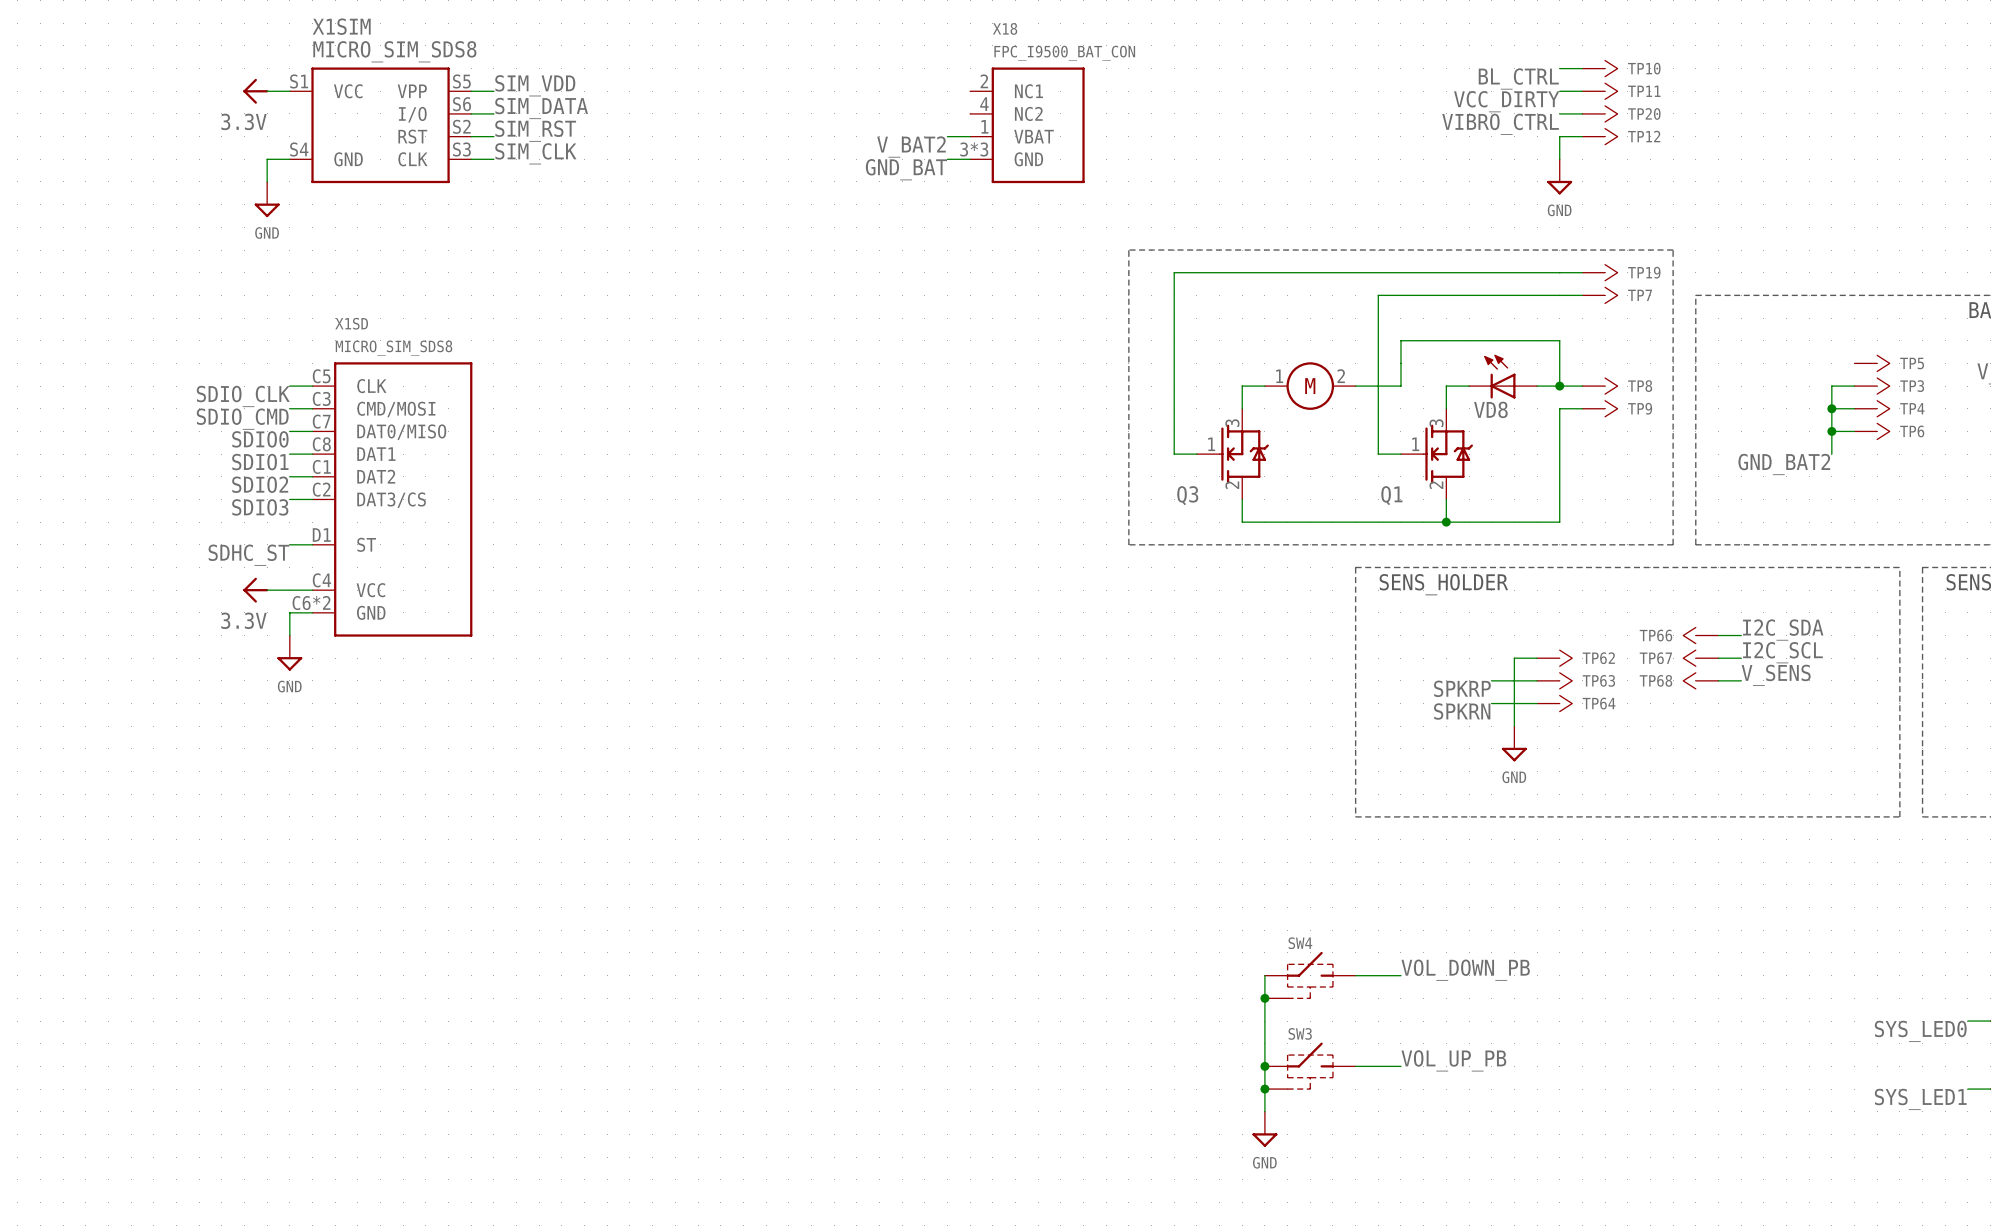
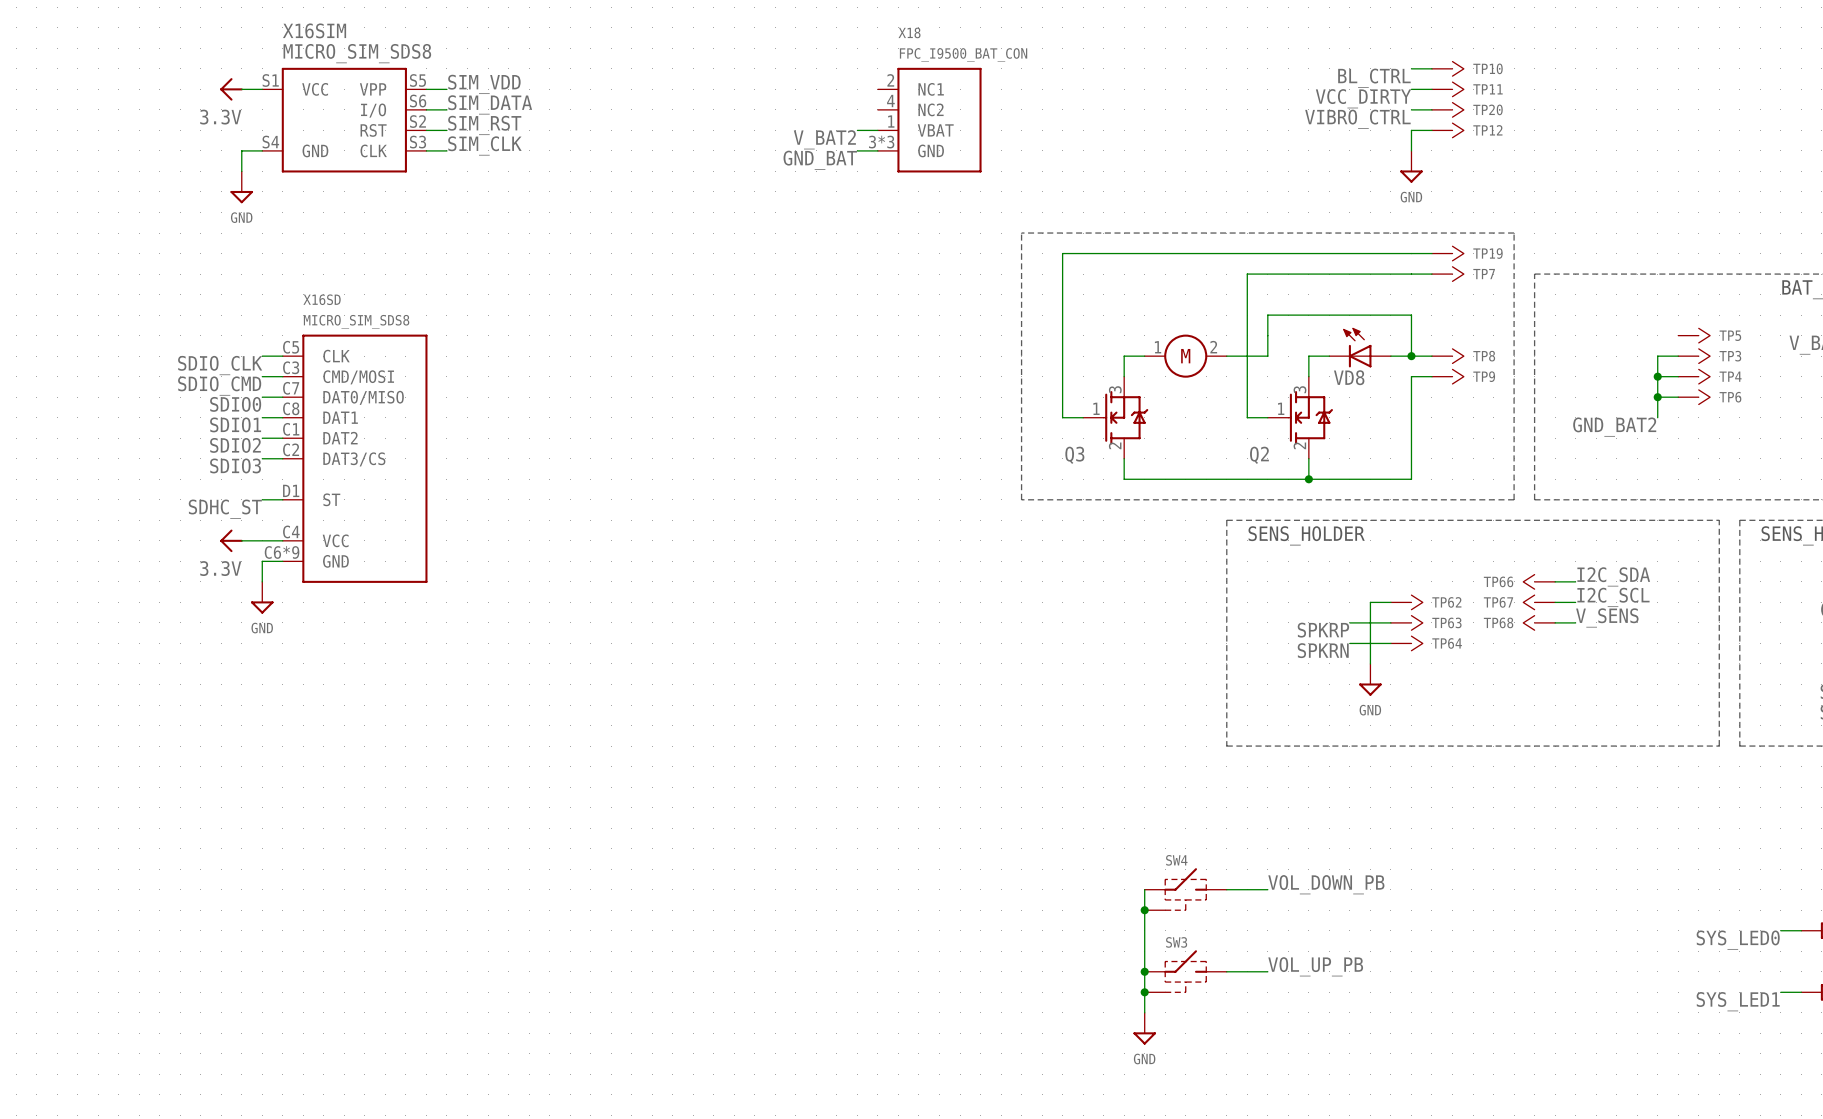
X1SIM name: X1SIM (341, 26) -> X16SIM (314, 30)
X1SD name: X1SD (351, 323) -> X16SD (322, 299)
Q1 name: Q1 (1391, 495) -> Q2 (1259, 455)
X1SD pin number: C6*2 (311, 603) -> C6*9 (282, 552)

